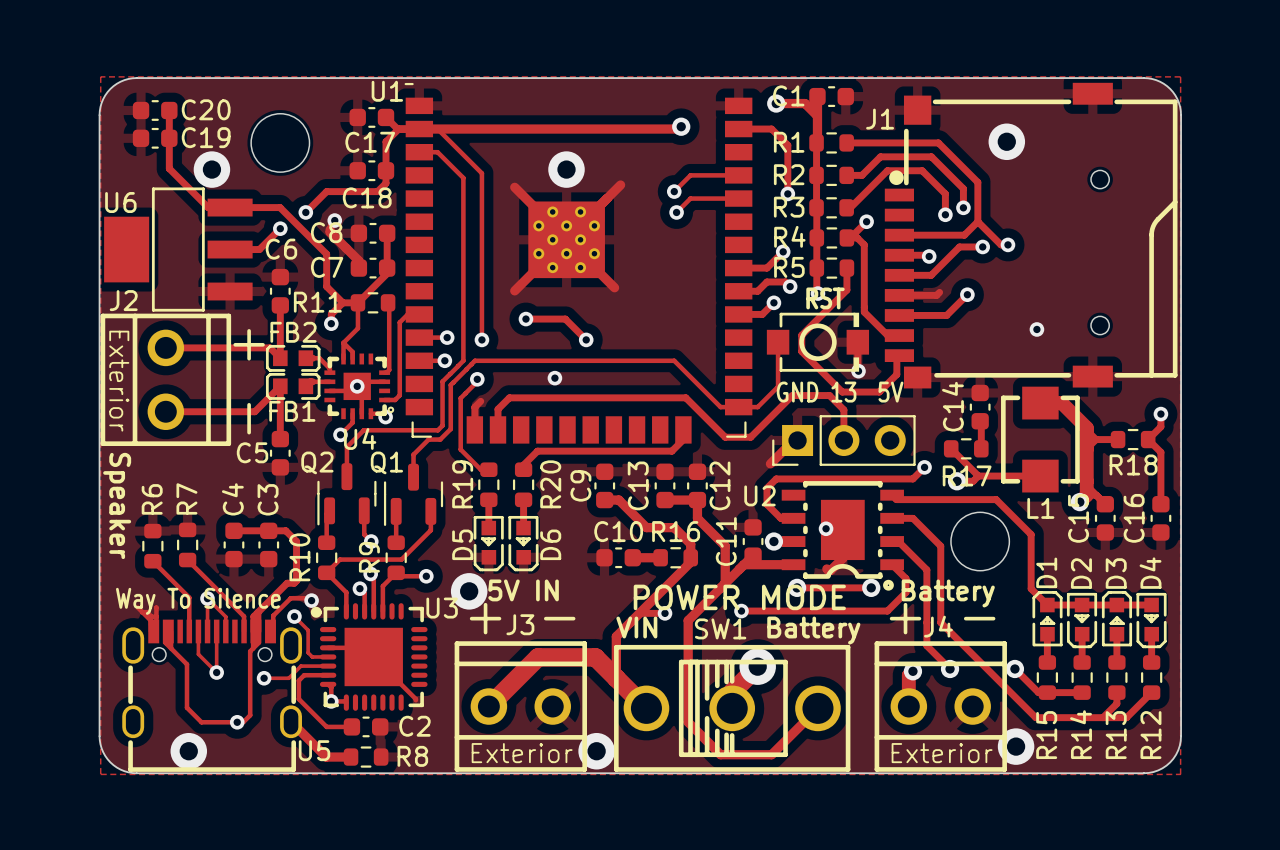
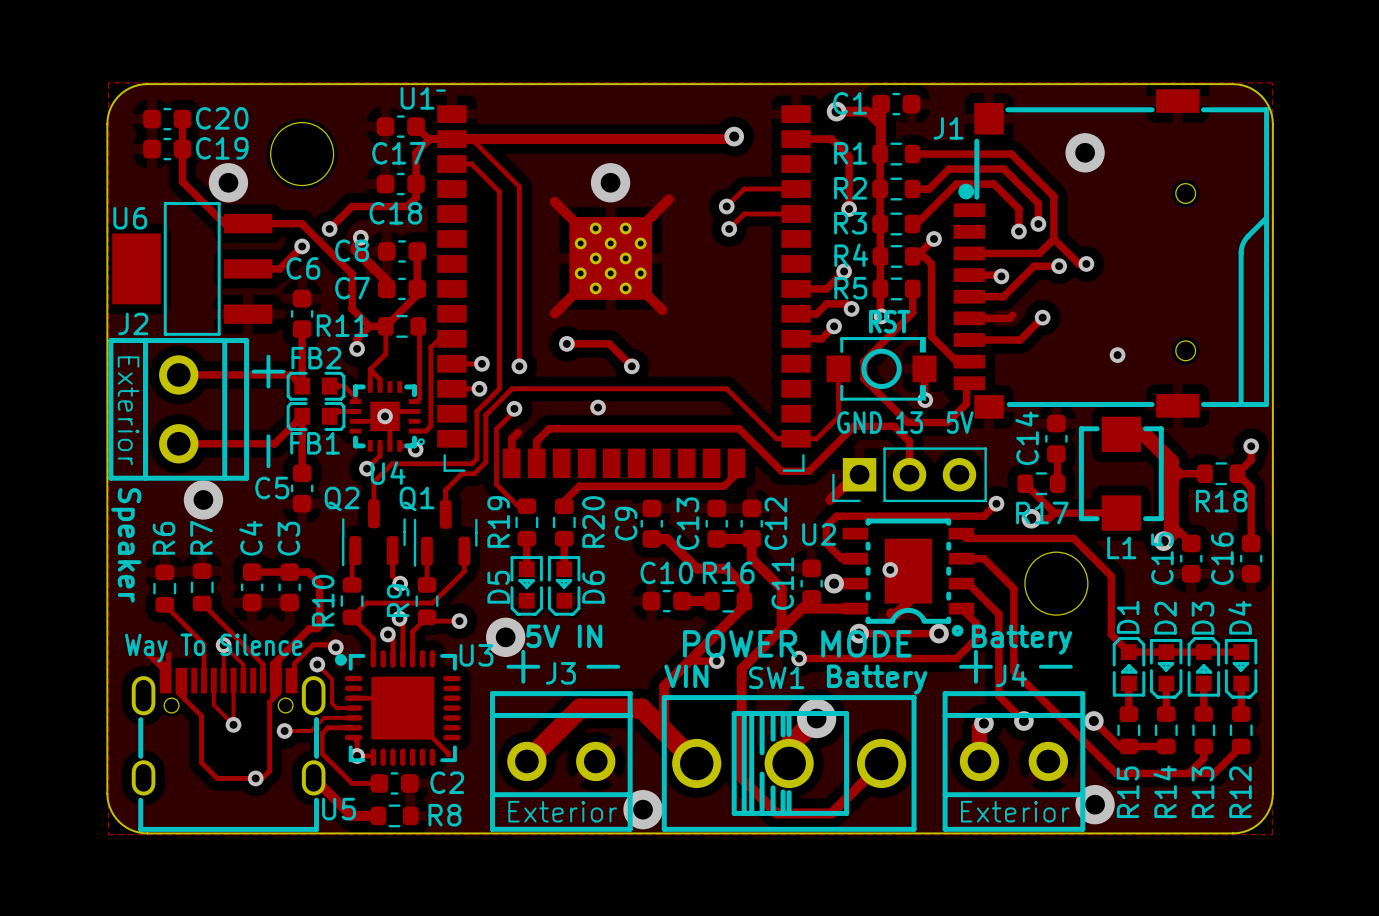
via: none -> (203, 499)
via: (188, 751) -> none

